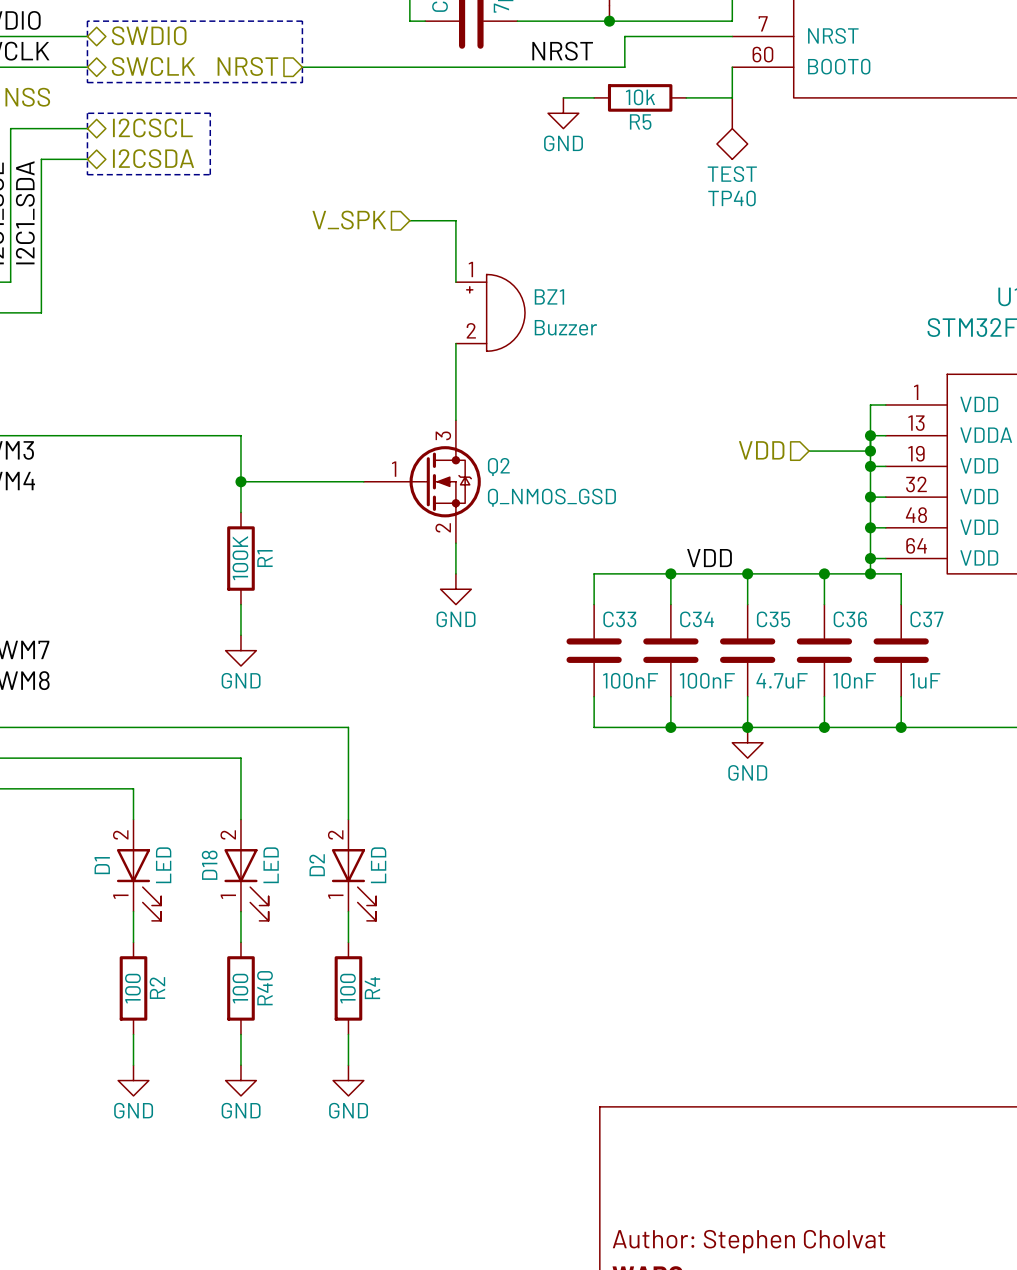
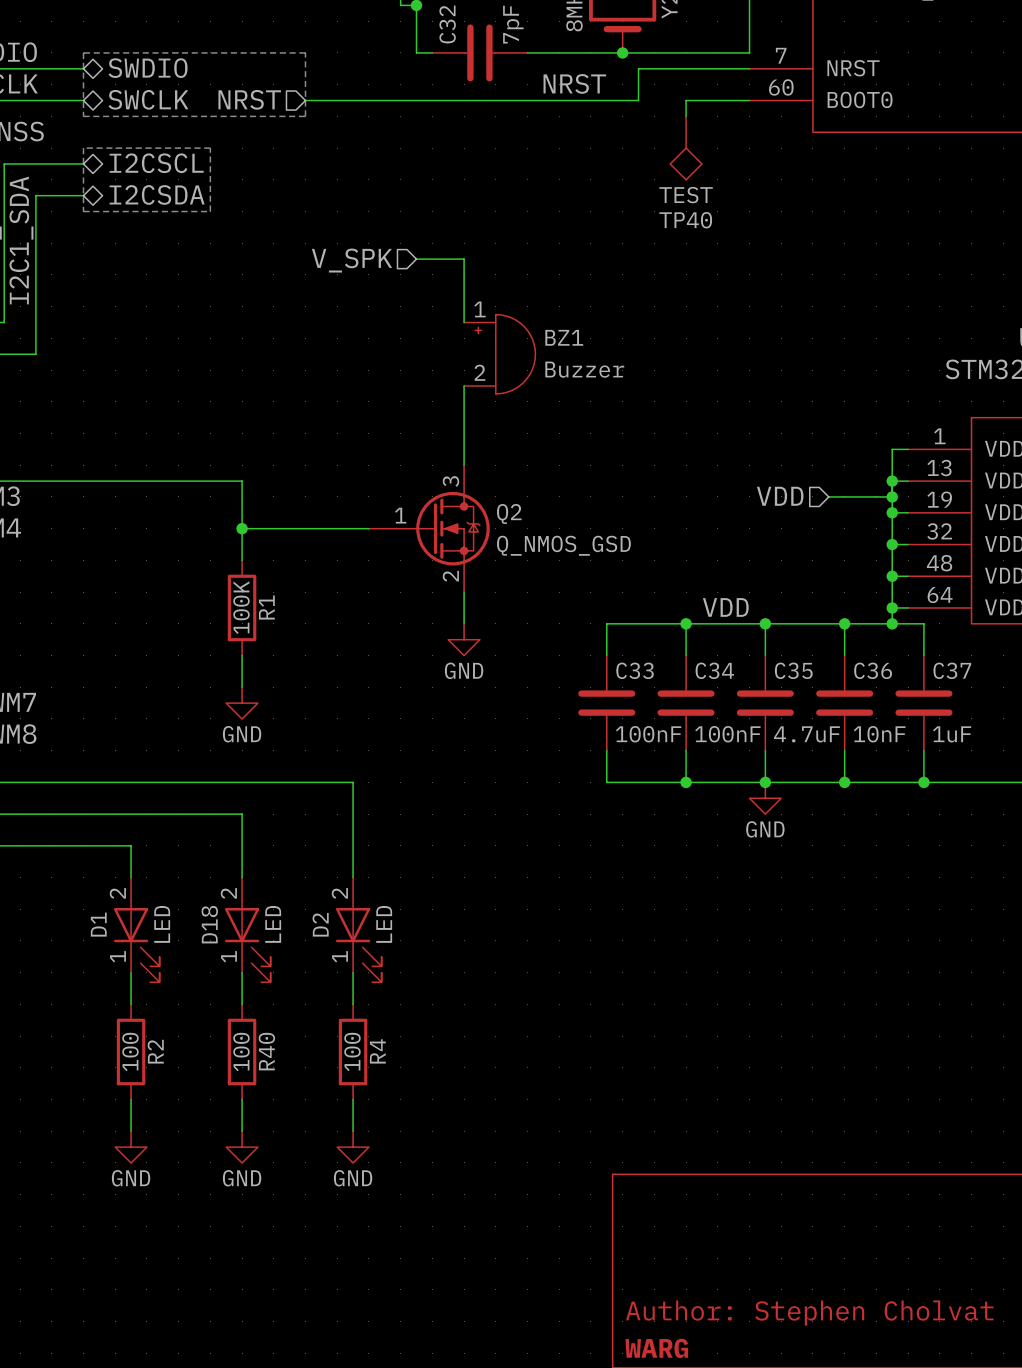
wire: (732, 67) (732, 97) (686, 97) -> (749, 100) (686, 100) (686, 116)
wire: (563, 97) (594, 97) -> none
R5: 10k (640, 97) -> none
power symbol: GND (563, 113) -> none
TP40 position: (732, 128) -> (686, 148)

